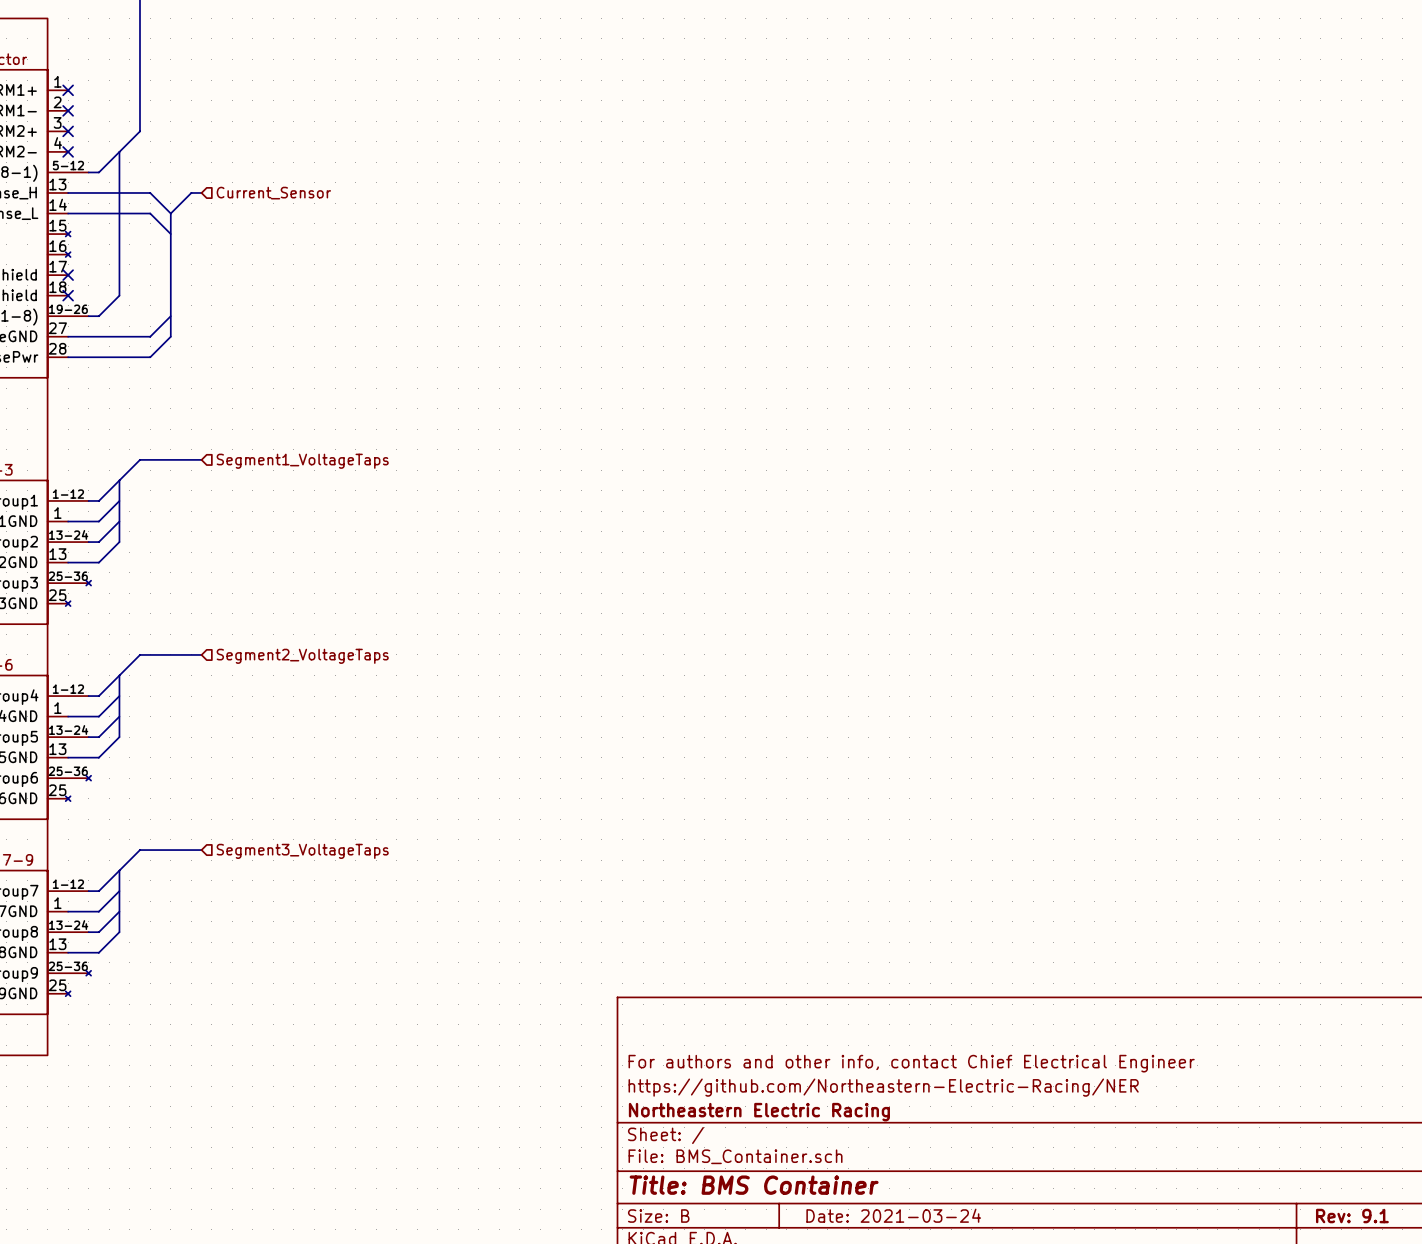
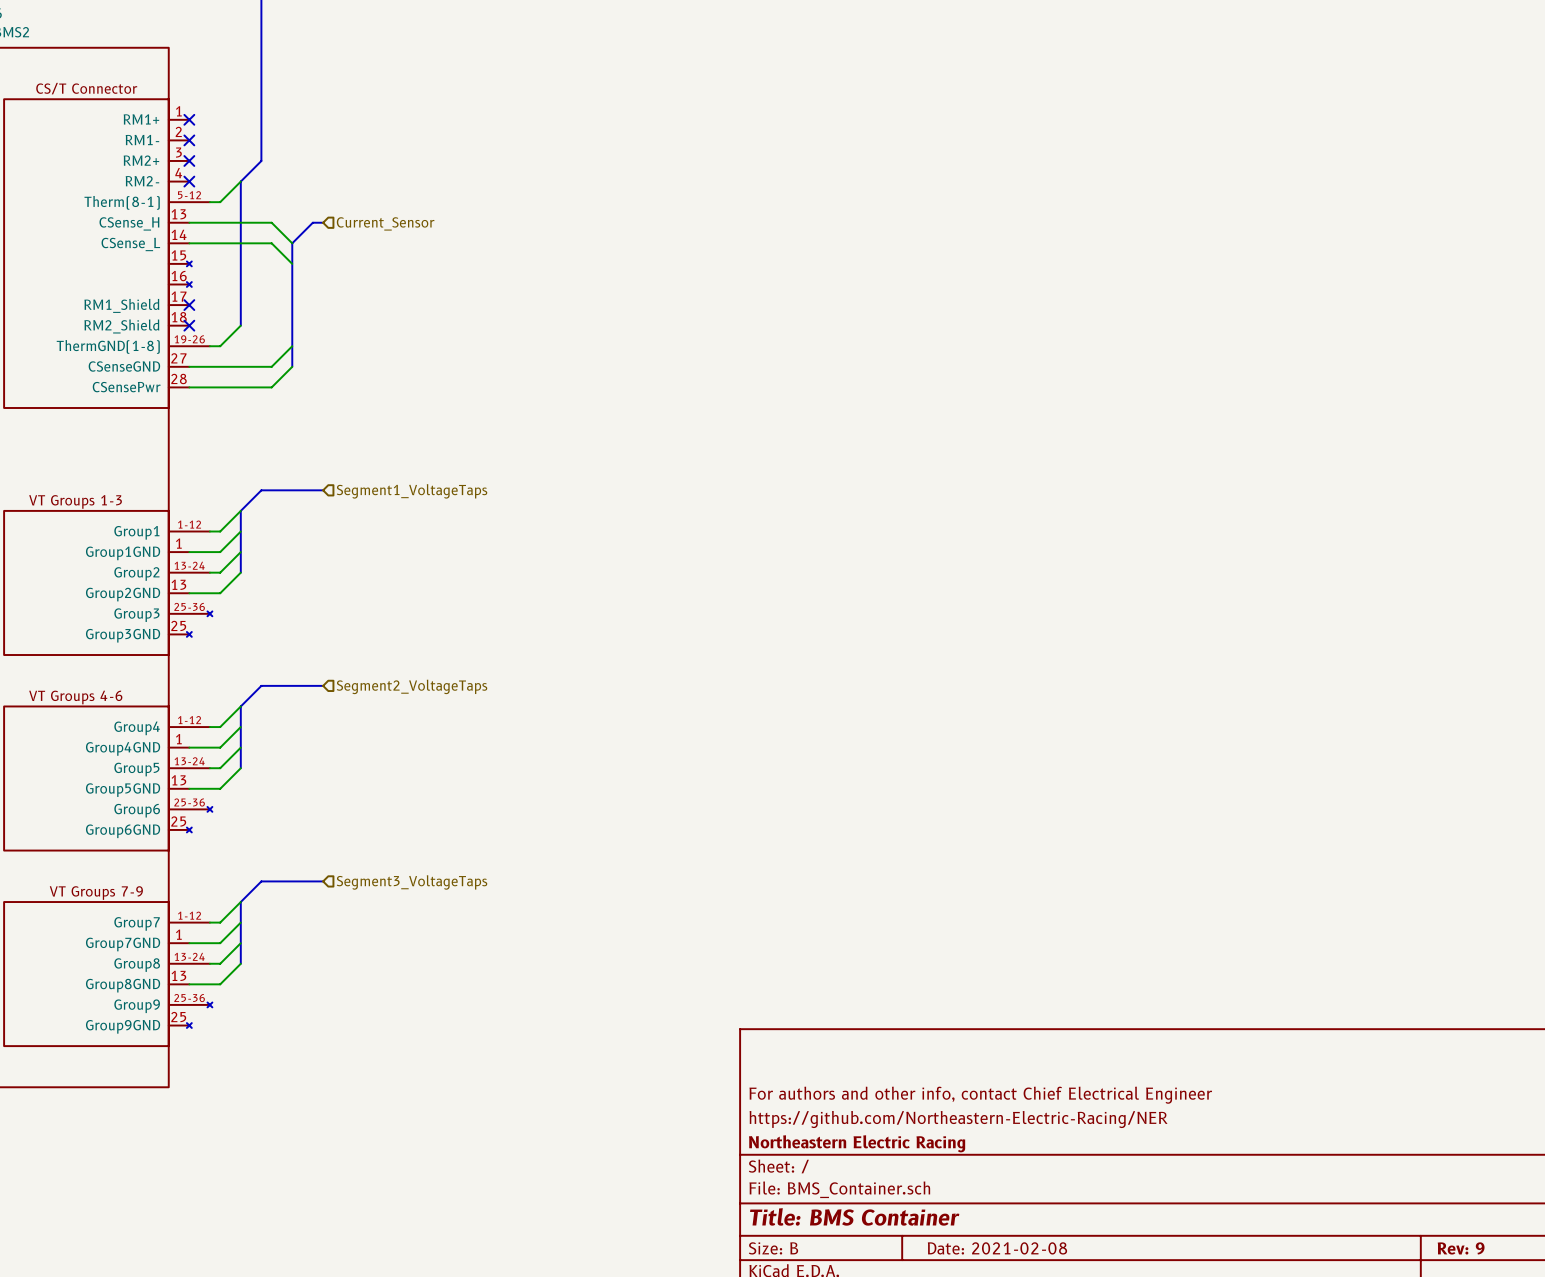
title block: Date: 2021-03-24 (893, 1215) -> Date: 2021-02-08 (997, 1248)
title block: Rev: 9.1 (1352, 1216) -> Rev: 9 (1461, 1248)

